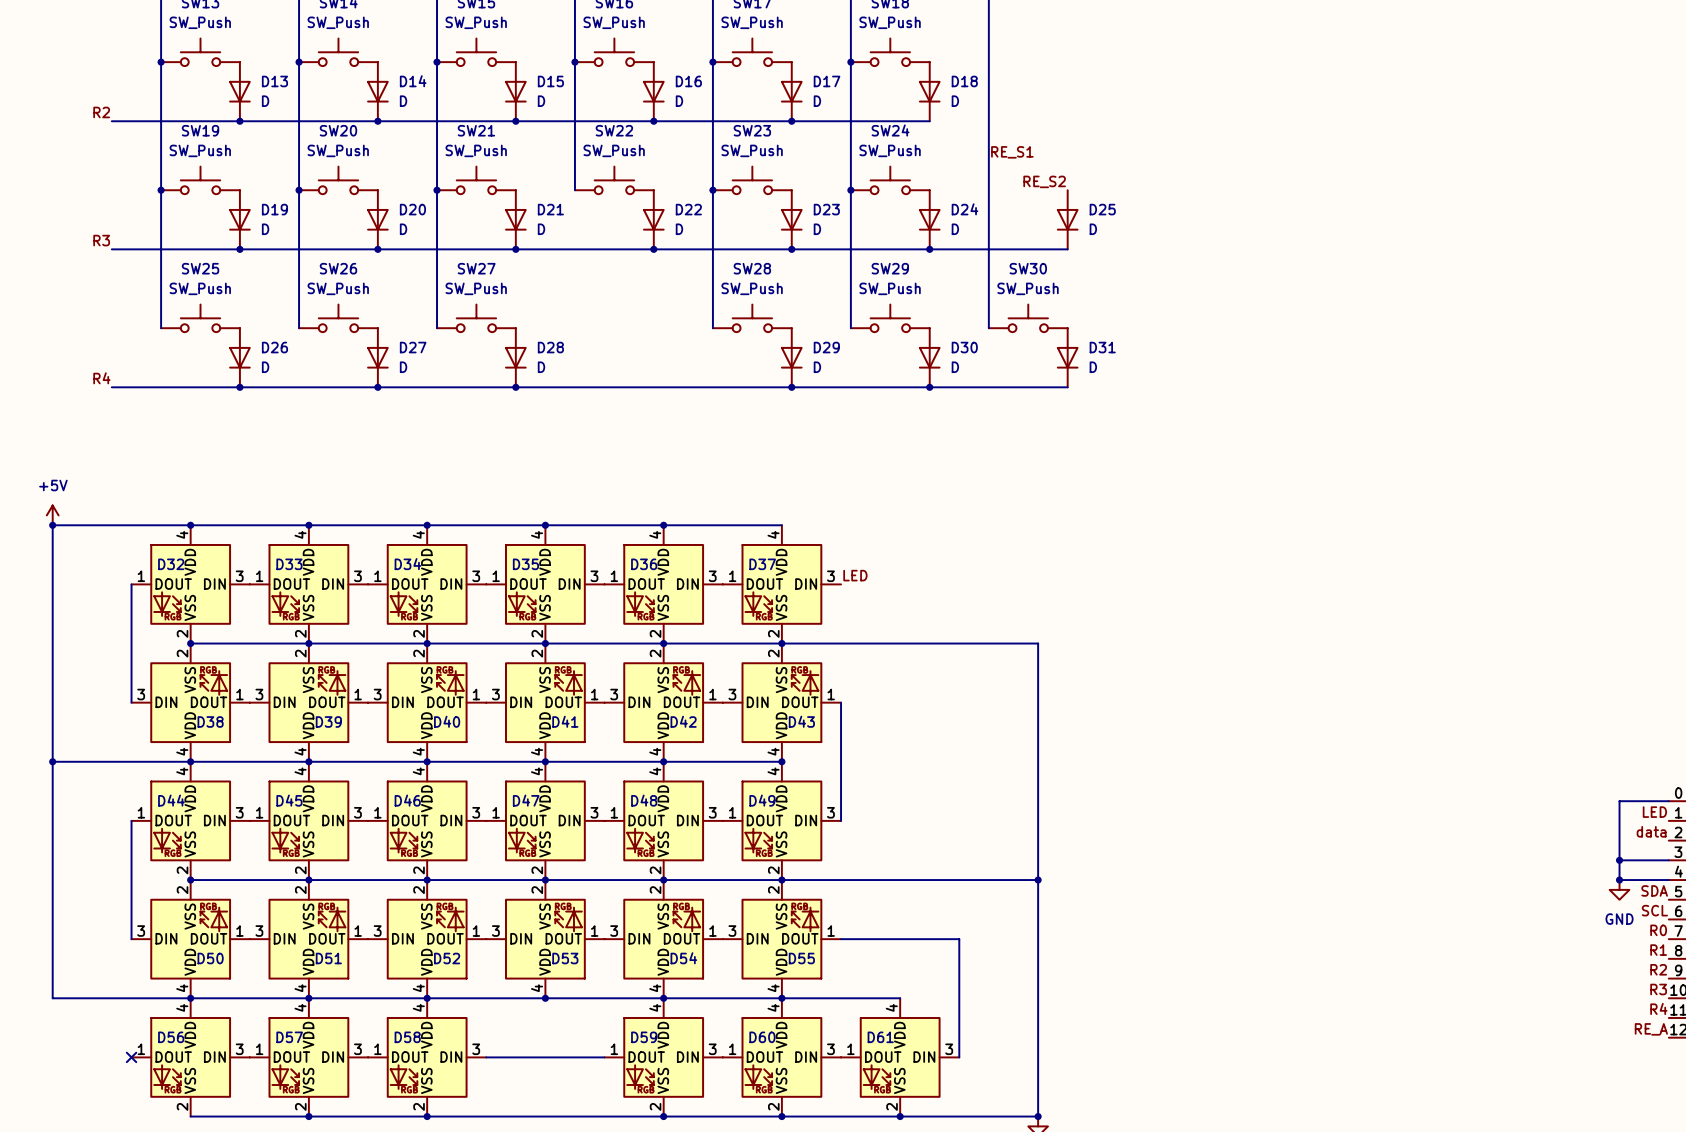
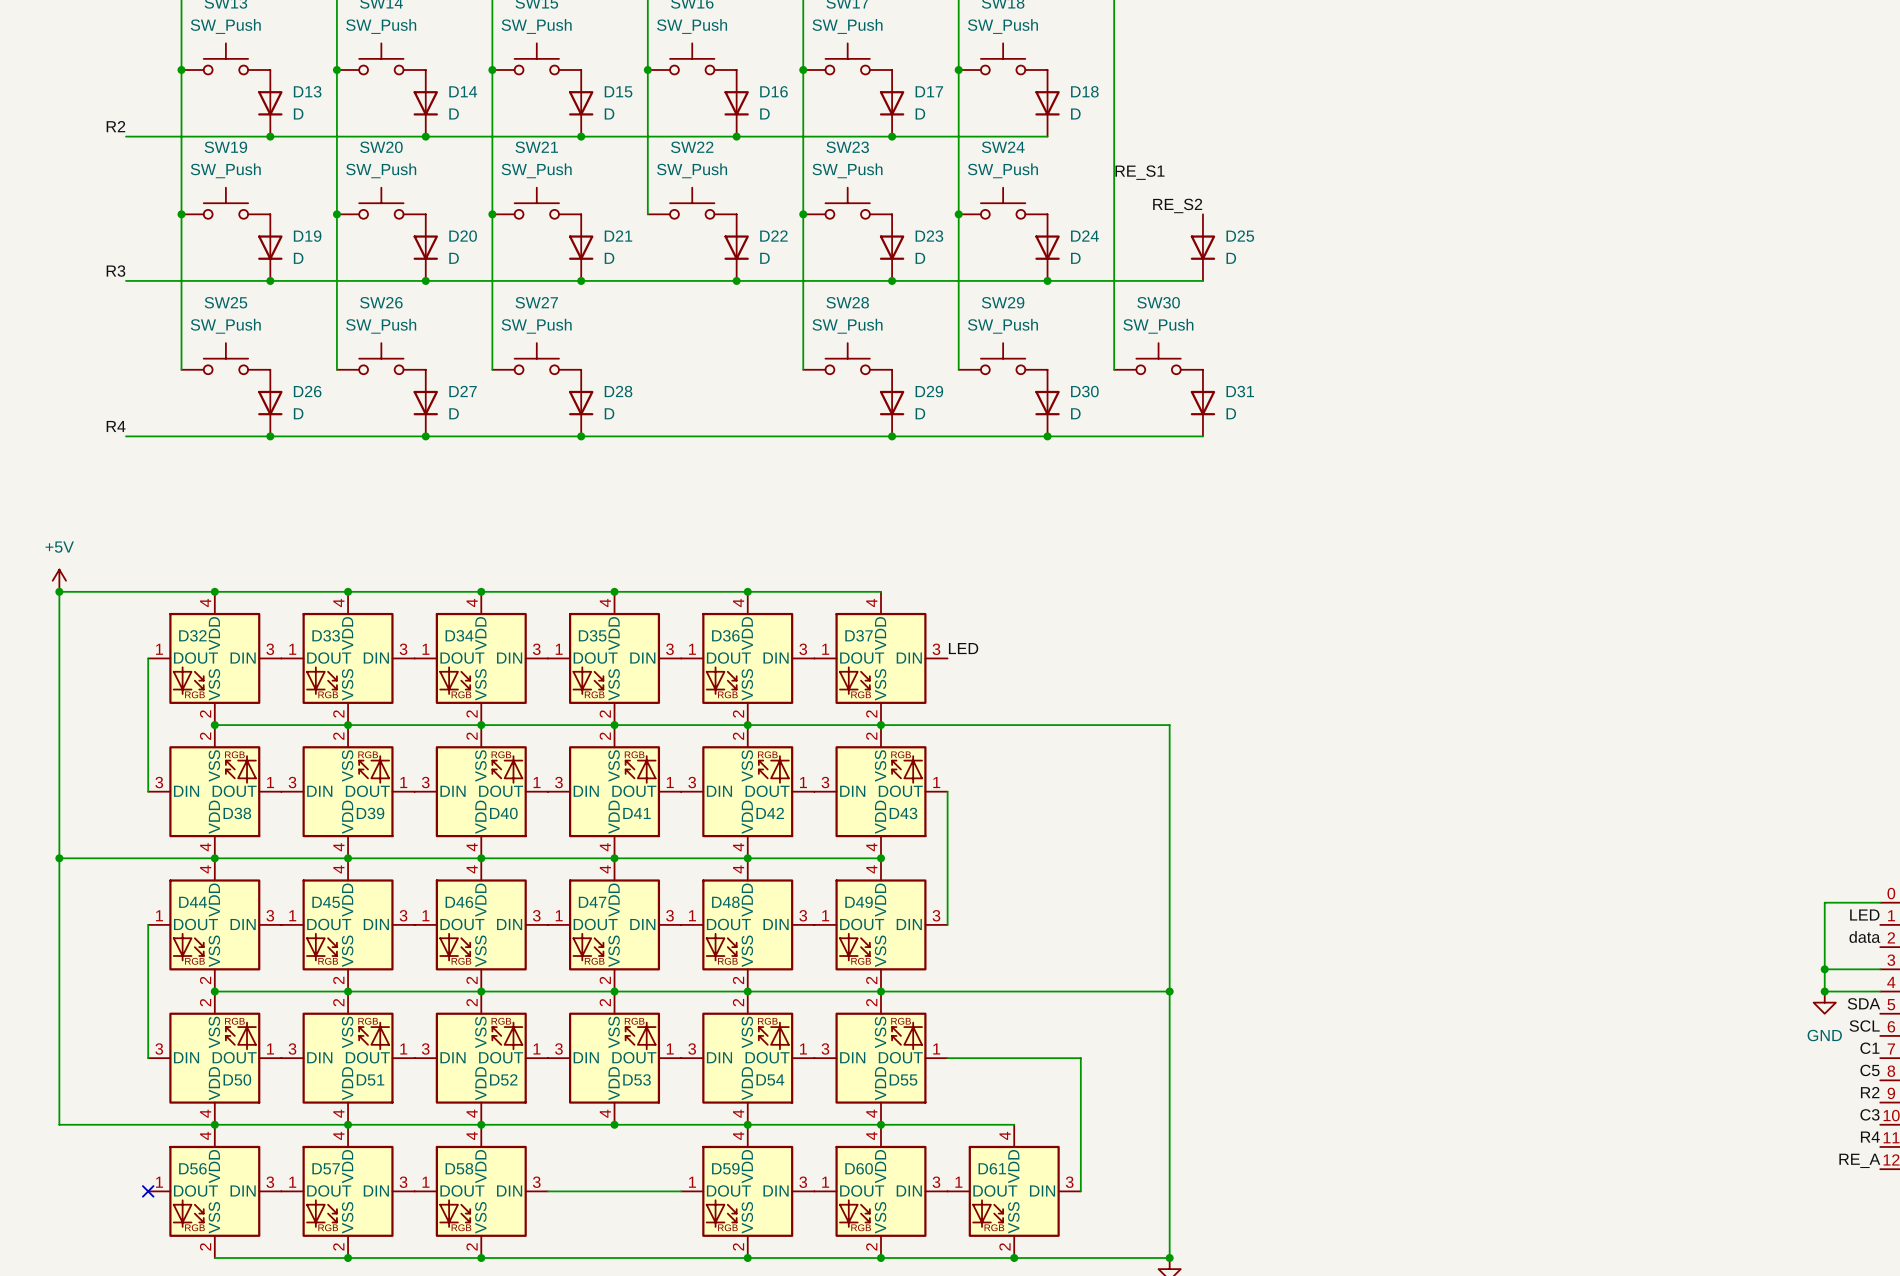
label: R0 (1658, 930) -> C1 (1869, 1048)
label: R1 (1658, 950) -> C5 (1870, 1070)
label: R3 (1658, 989) -> C3 (1869, 1114)

